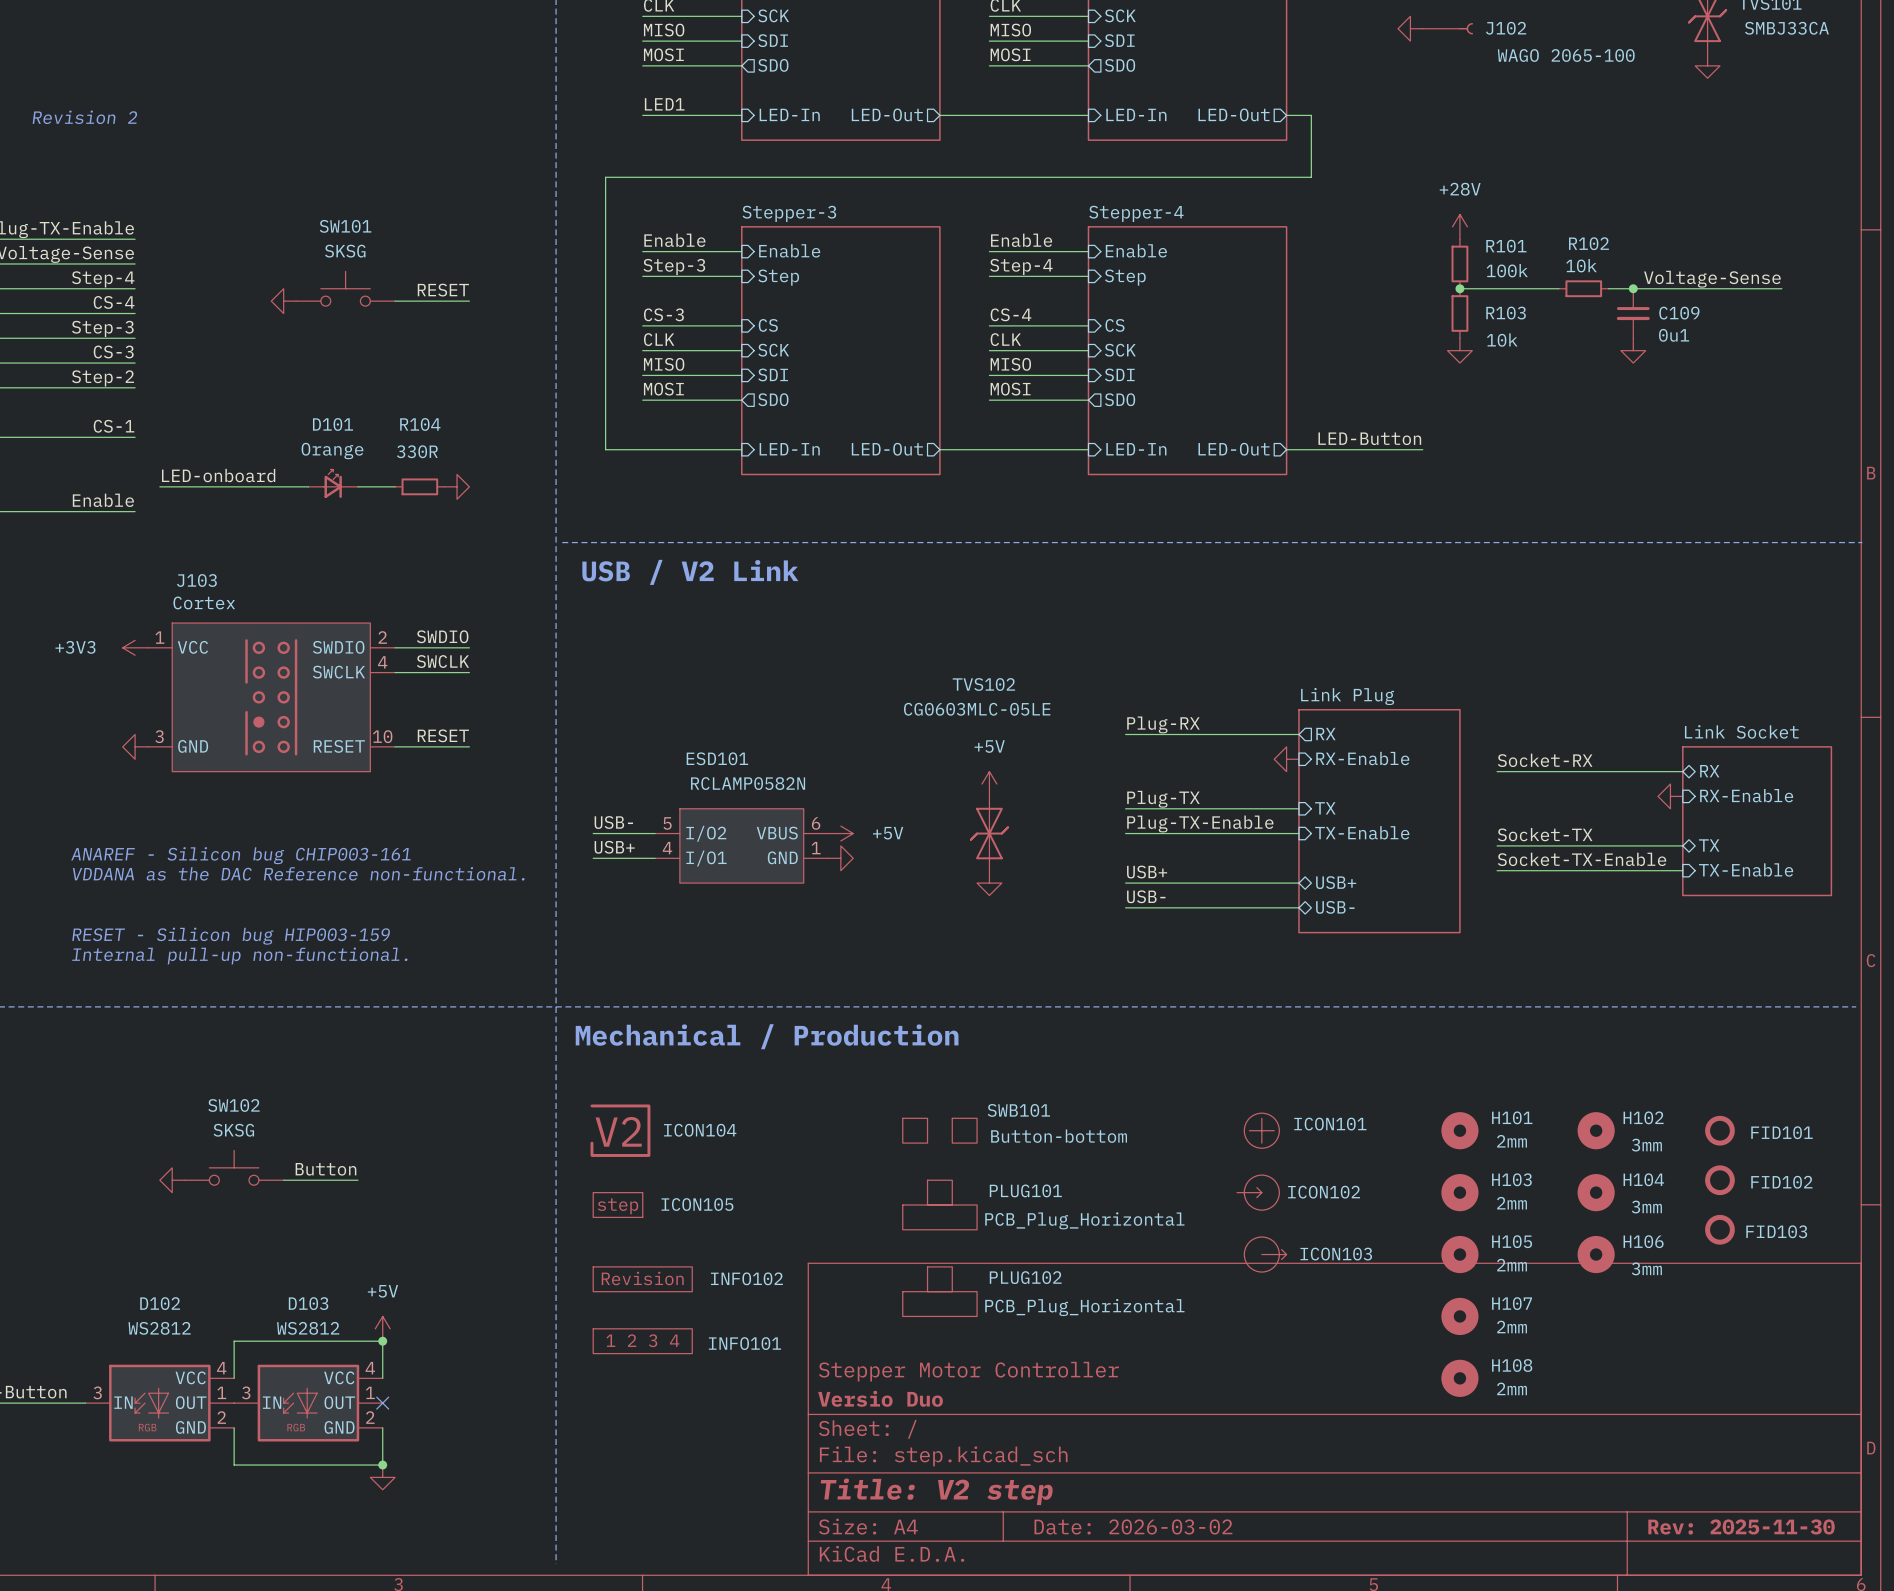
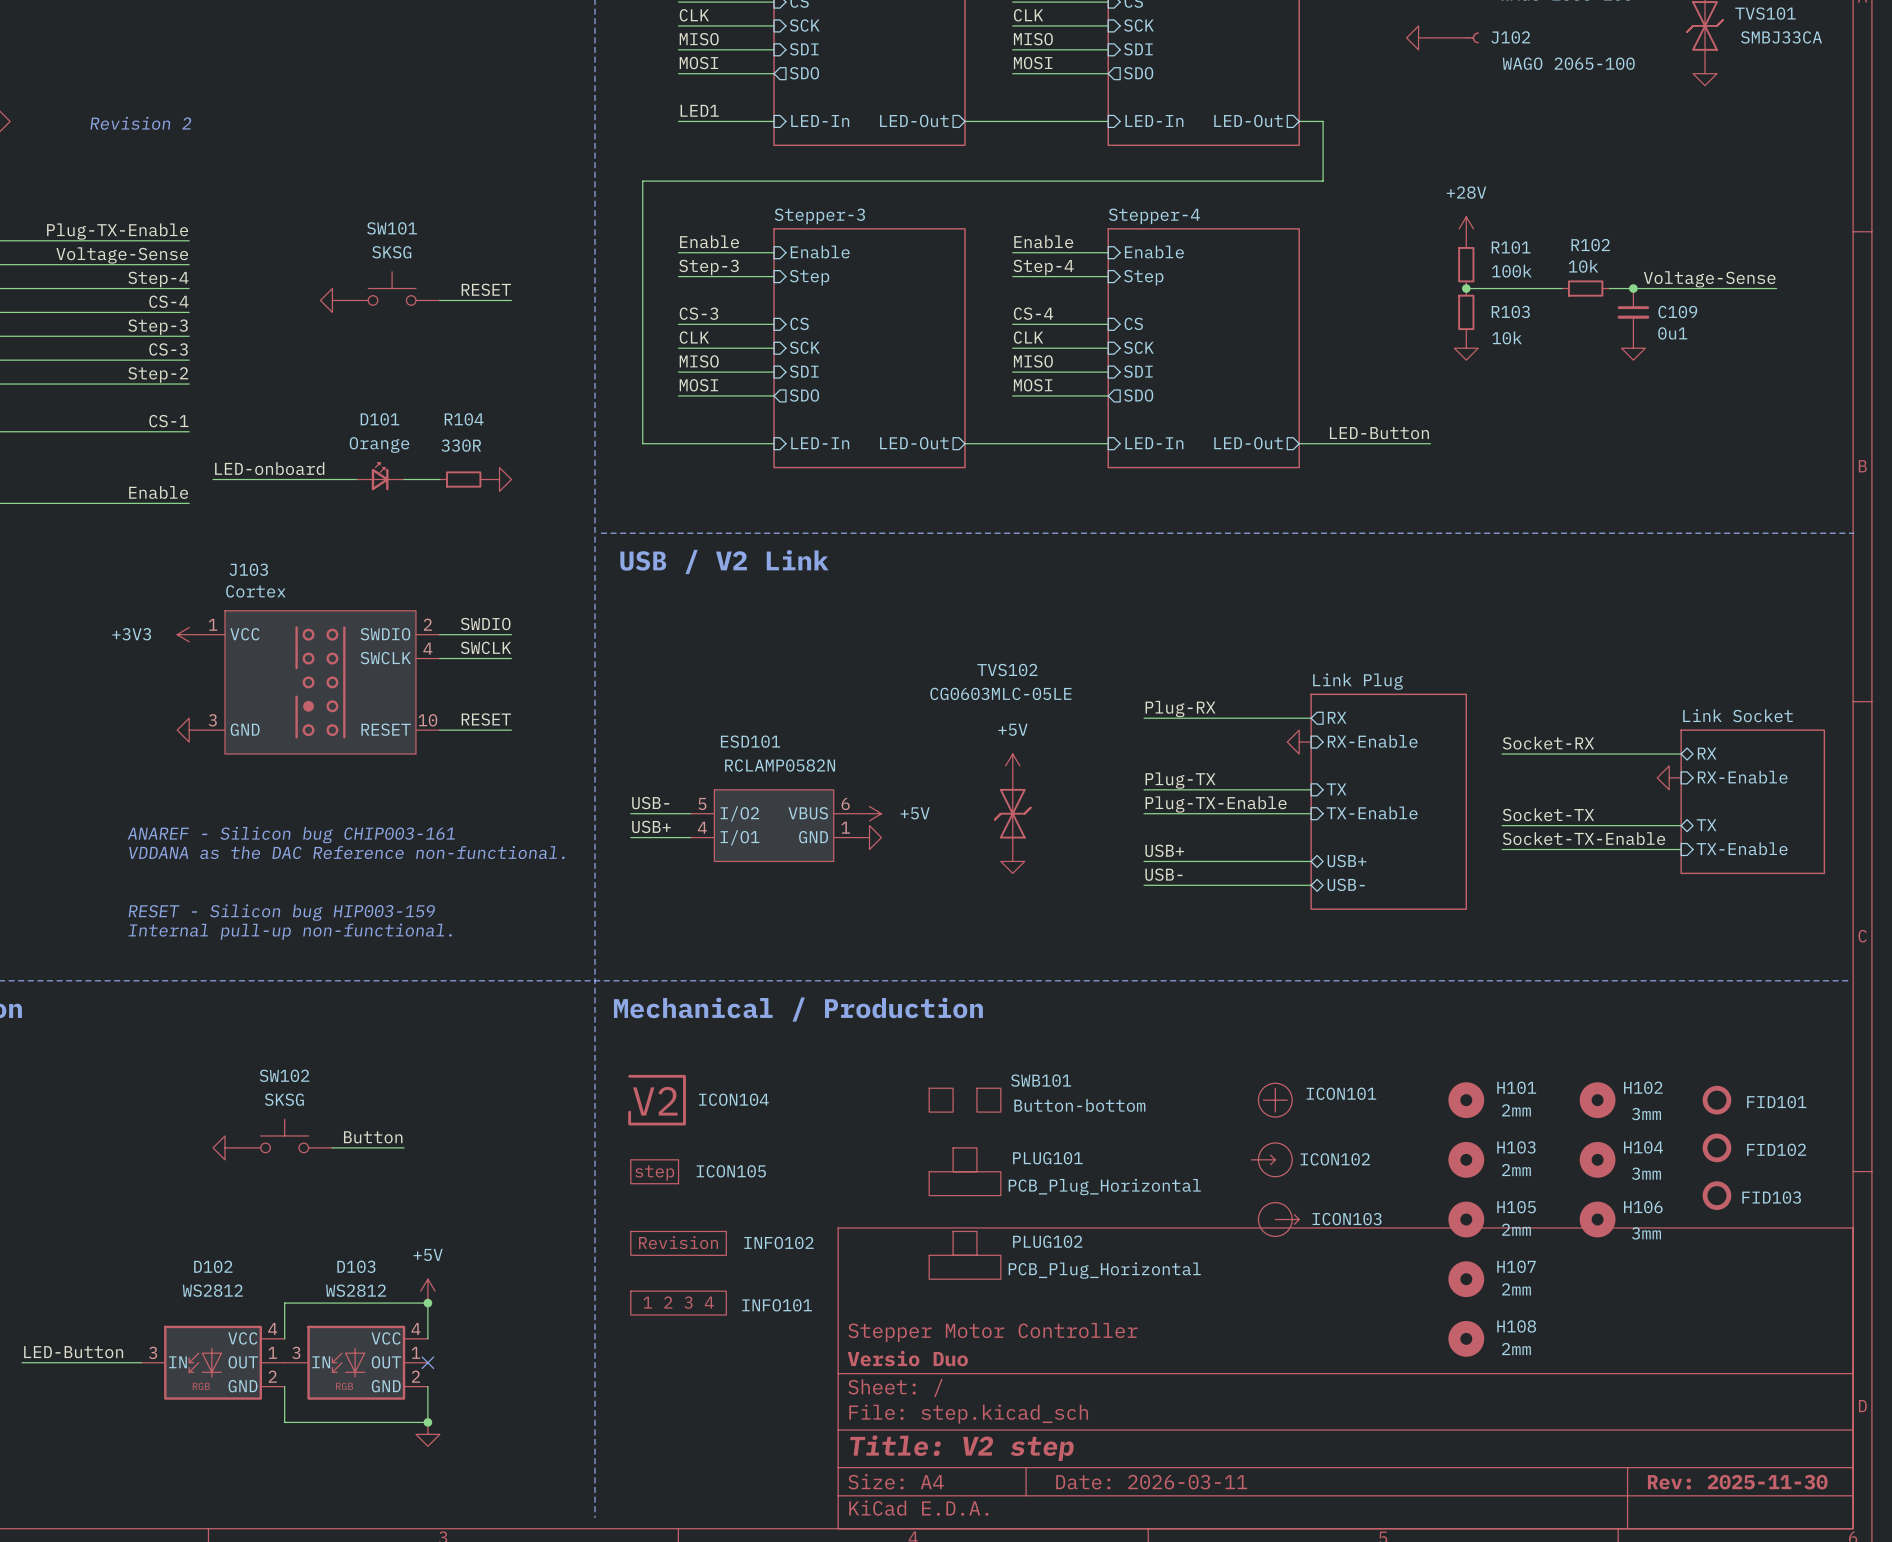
title block: Date: 2026-03-02 (1133, 1526) -> Date: 2026-03-11 (1151, 1482)

